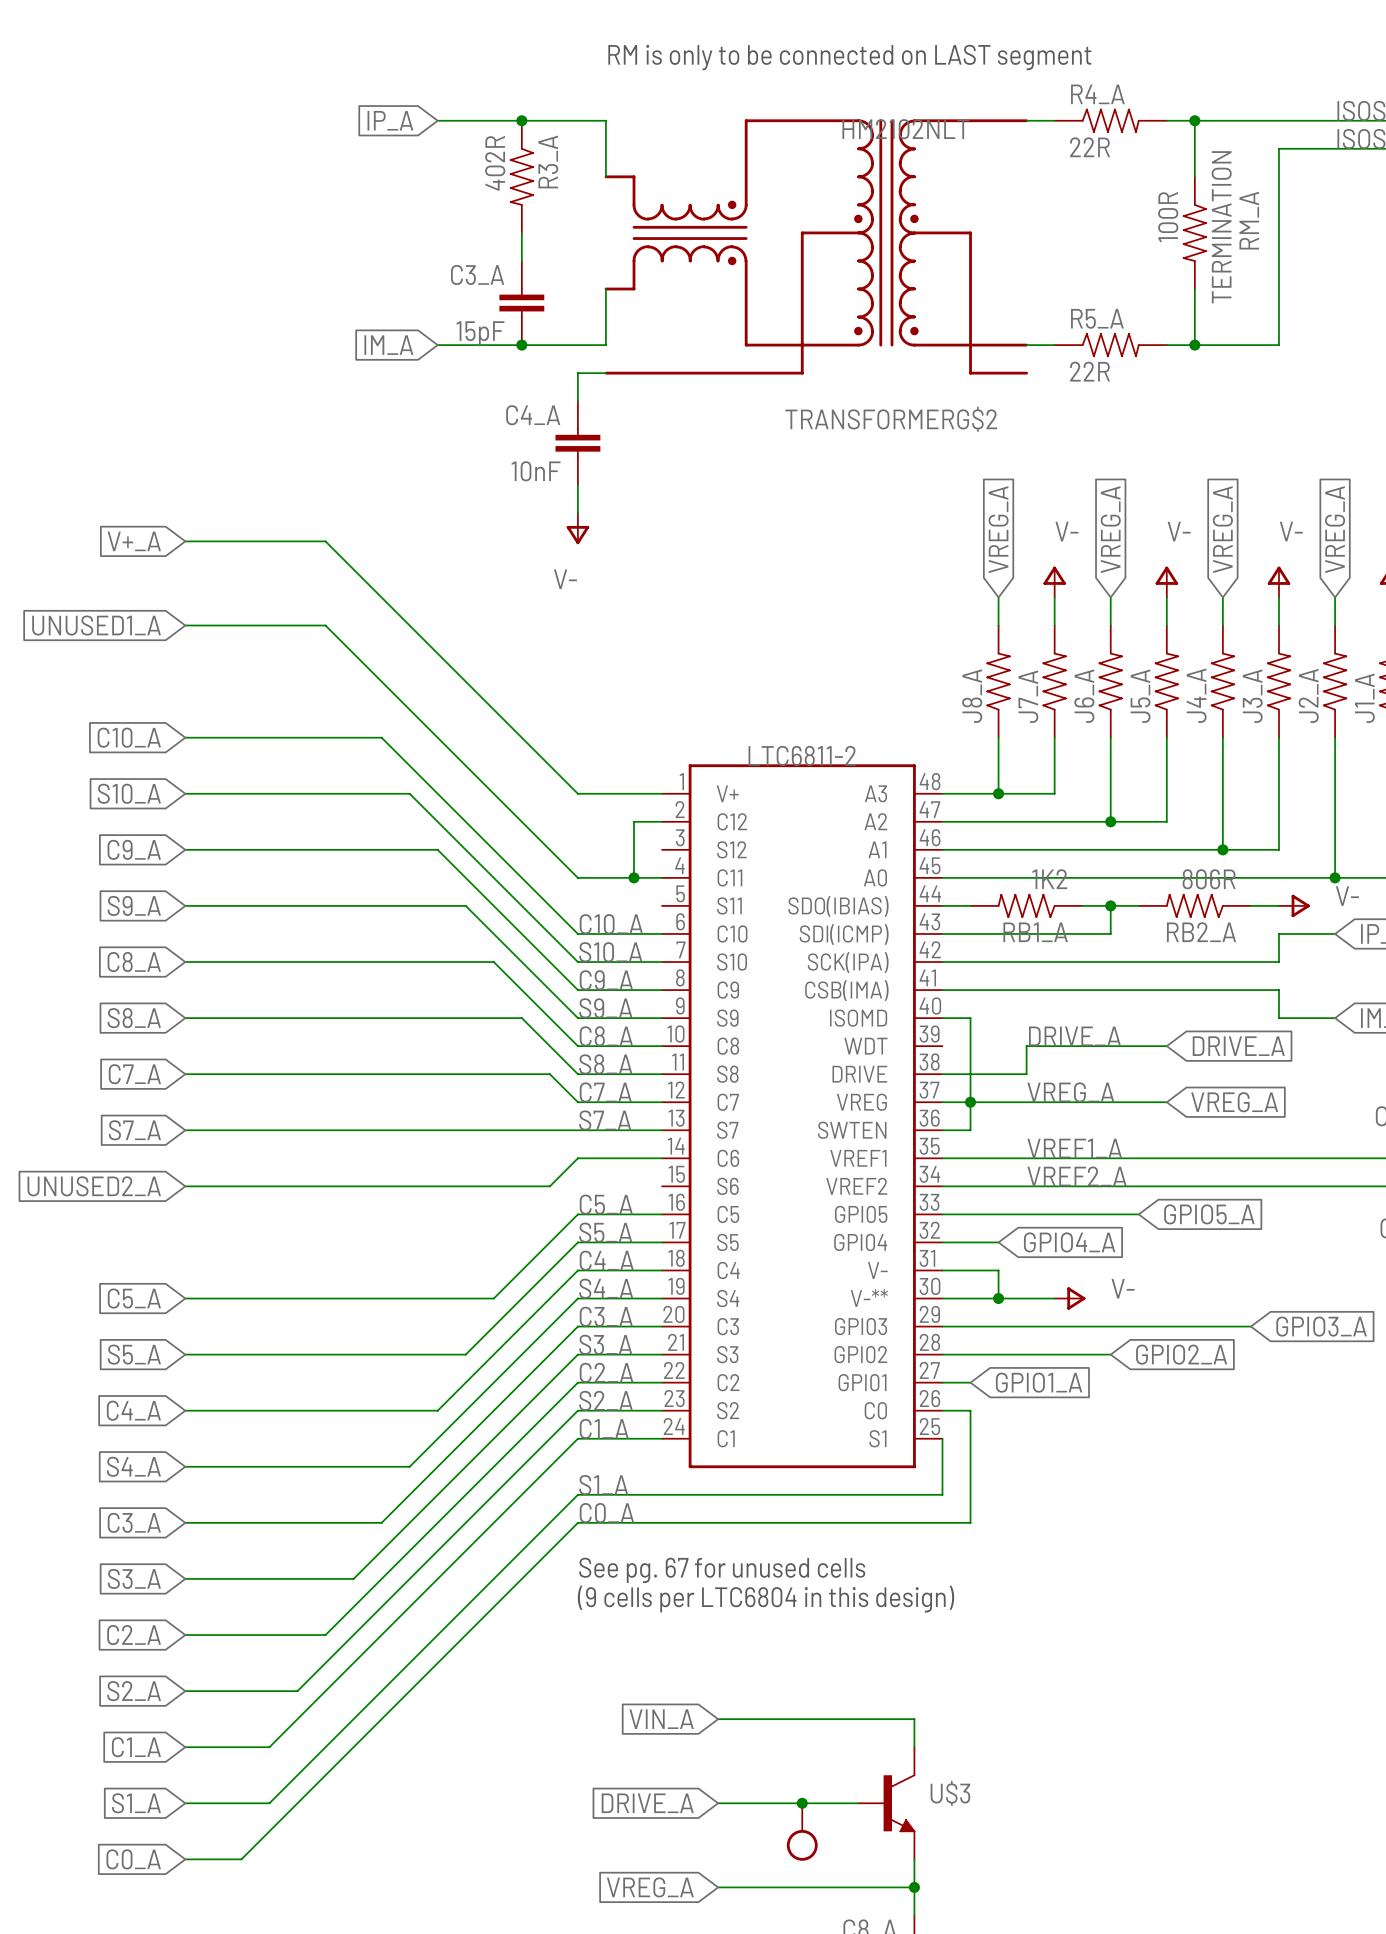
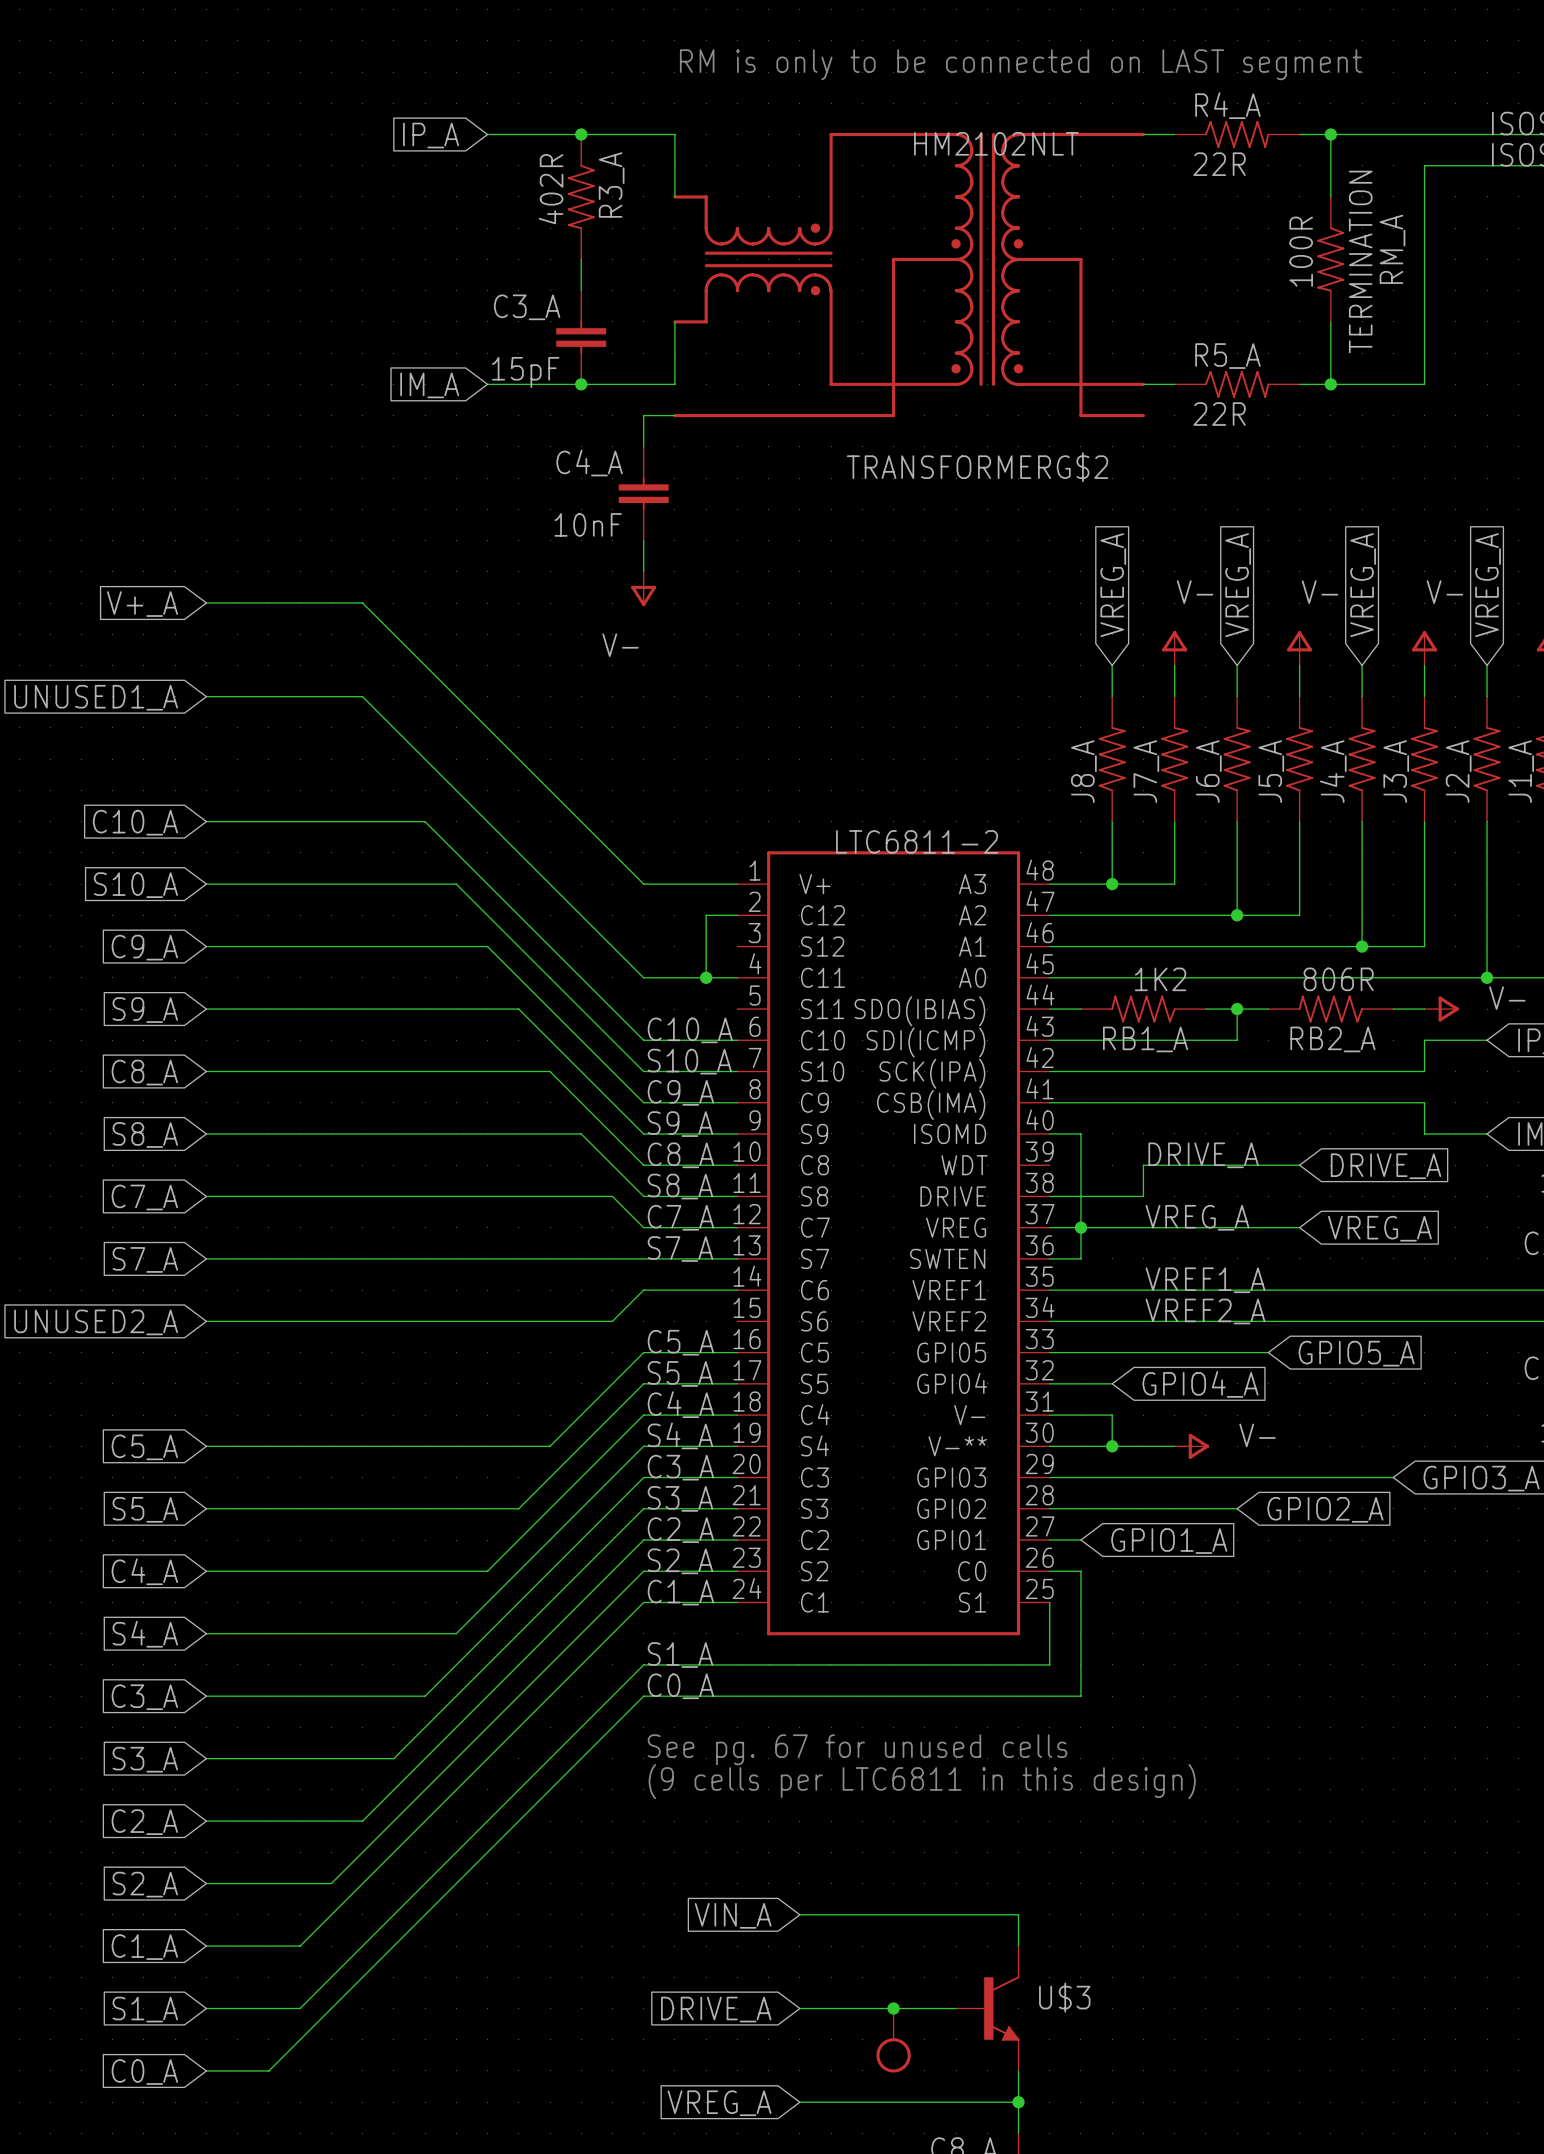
text: (9 cells per LTC6804 in this design) (765, 1599) -> (9 cells per LTC6811 in this design) (922, 1781)

